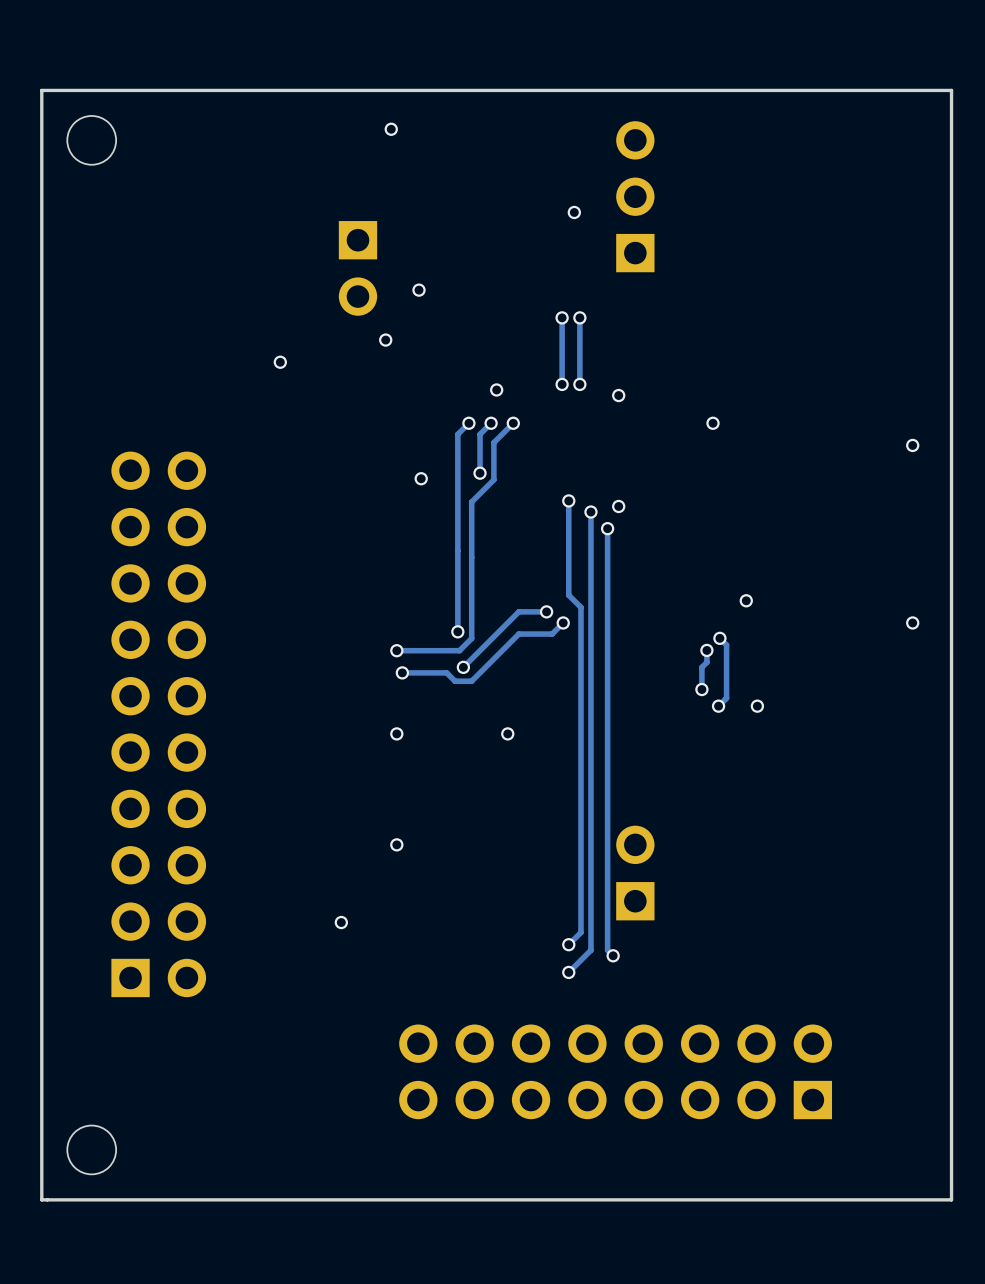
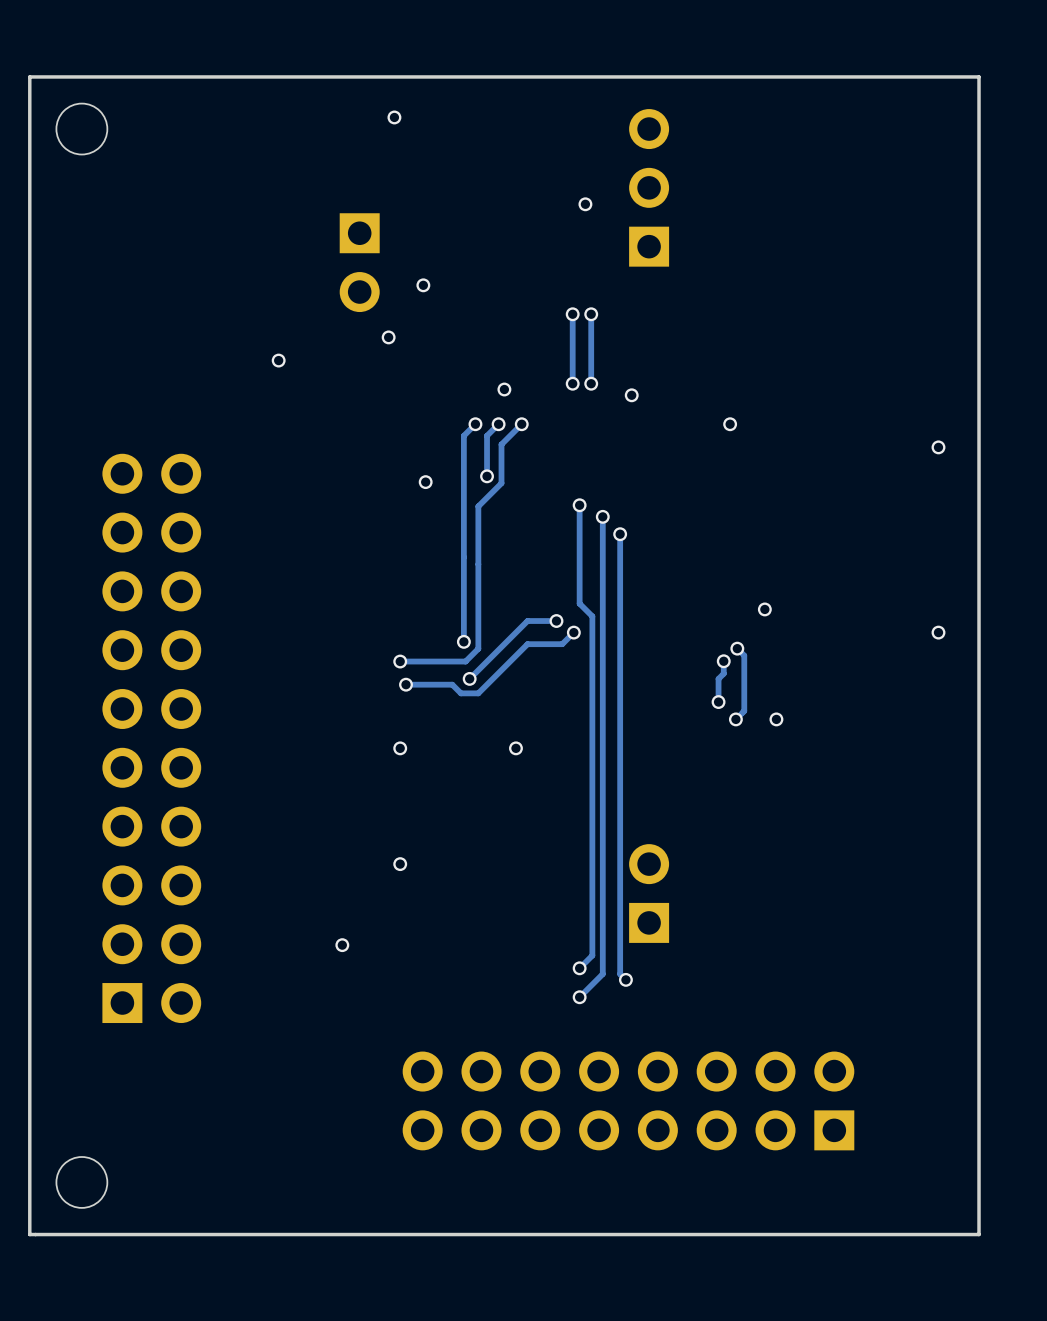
via: (618, 506) -> none

